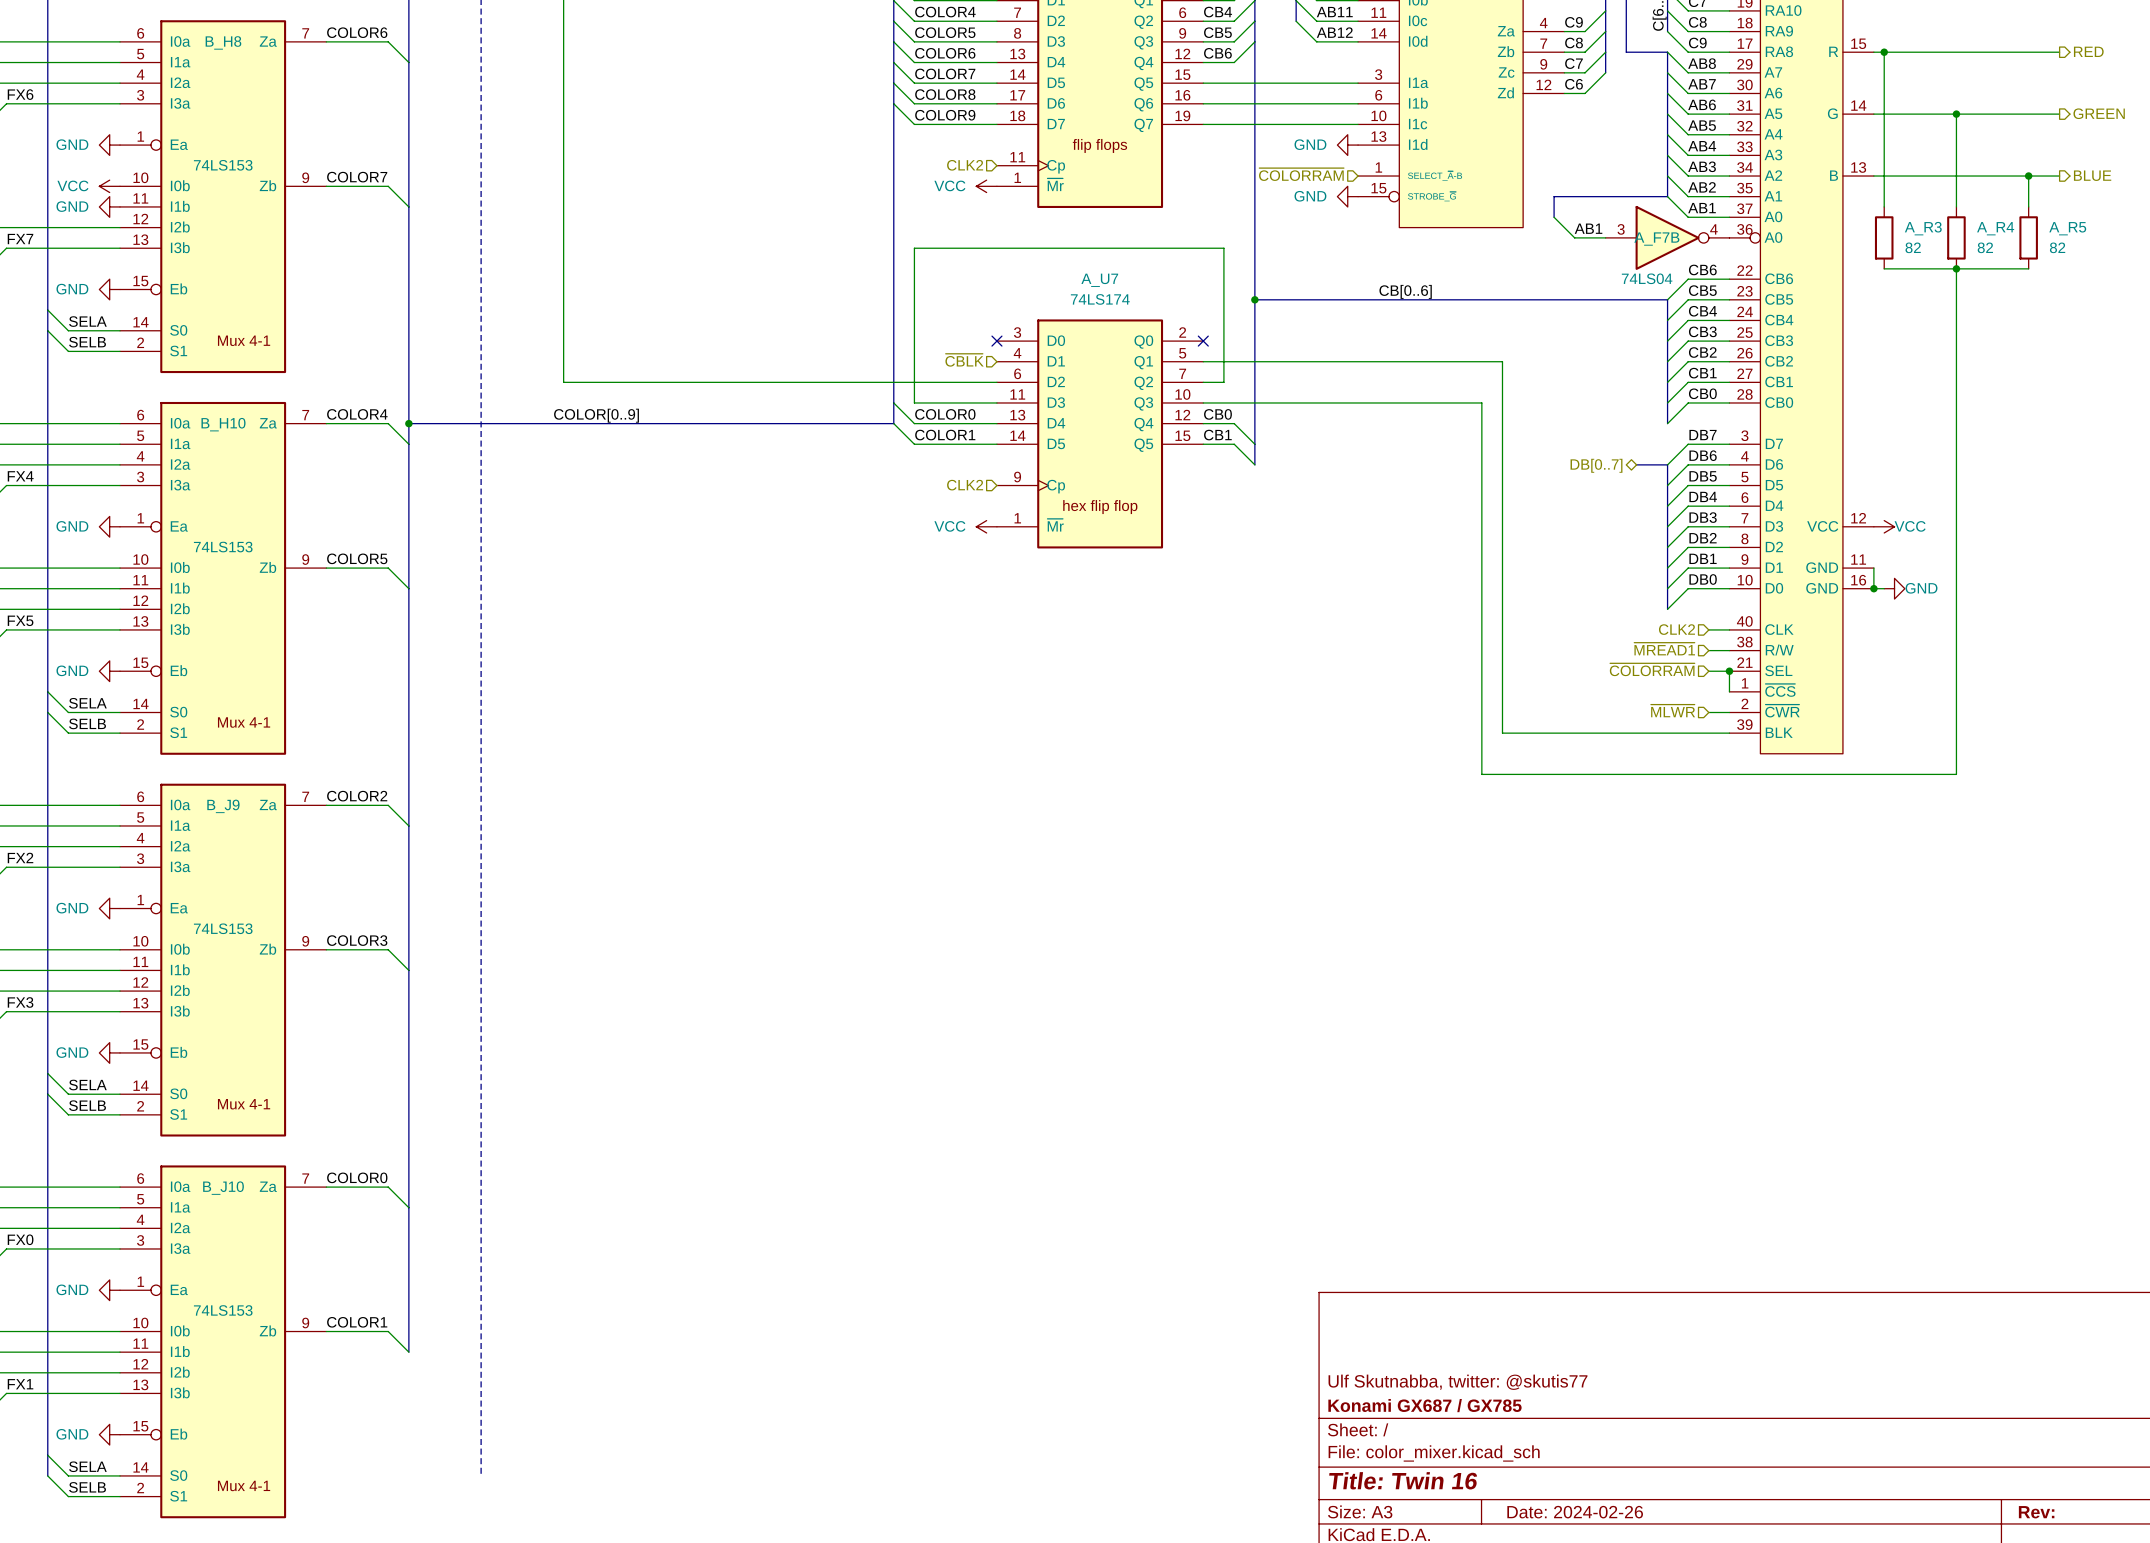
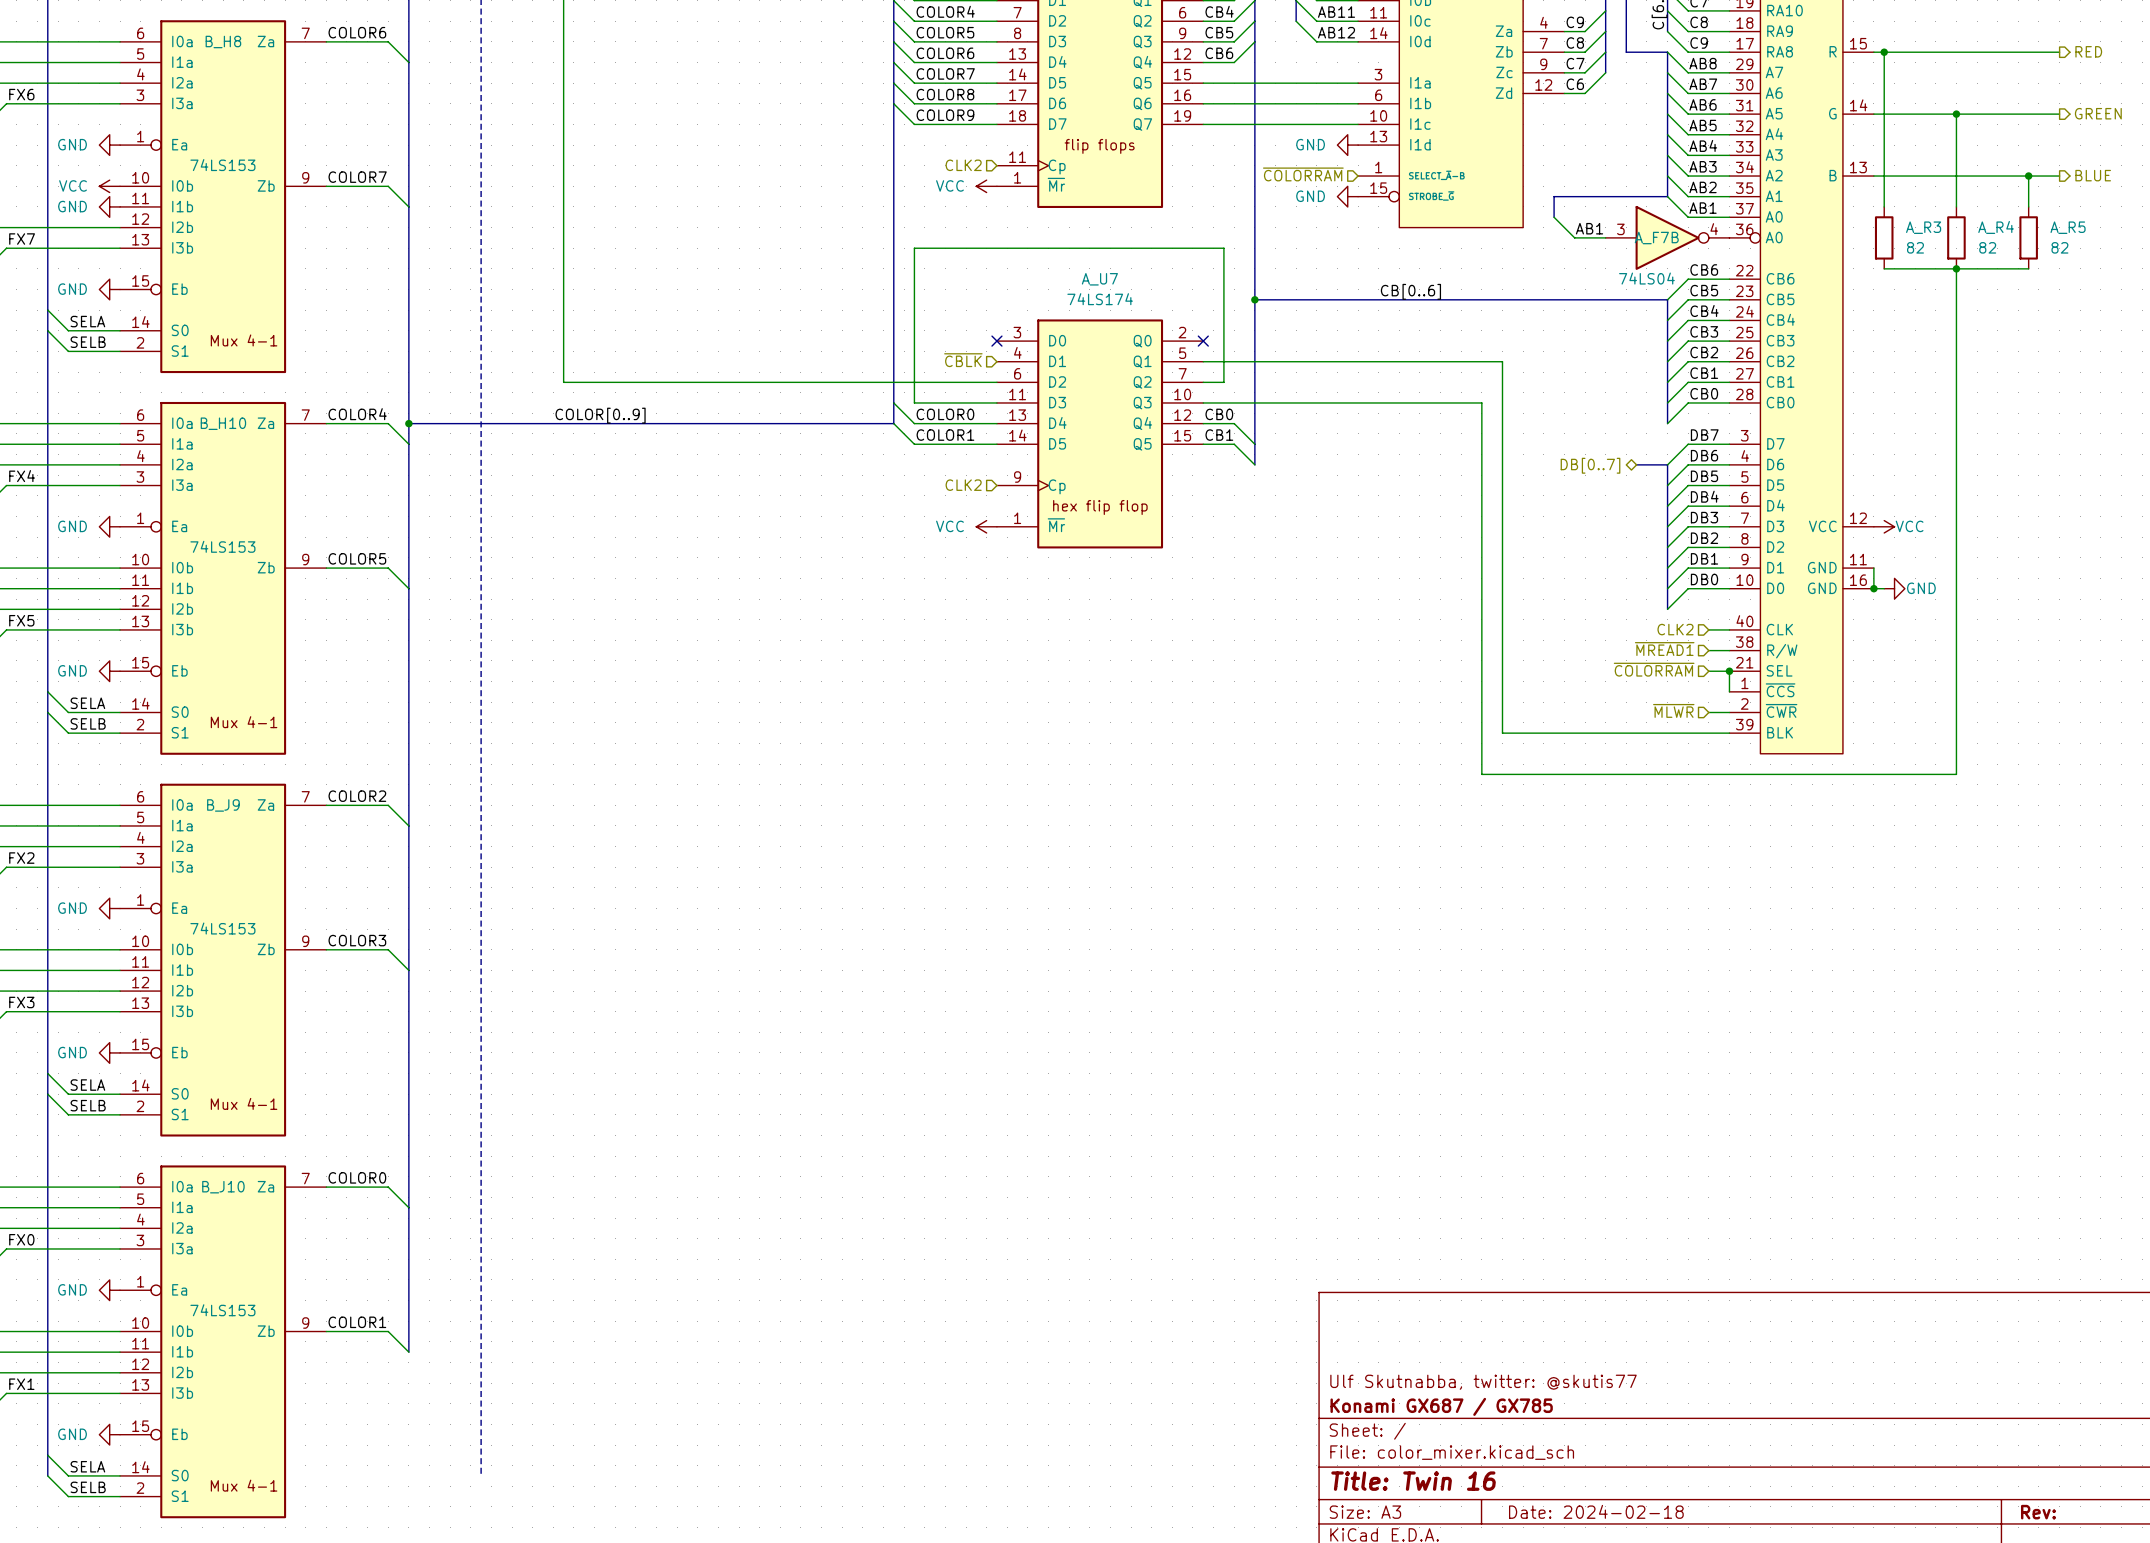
title block: Date: 2024-02-26 (1575, 1512) -> Date: 2024-02-18 (1596, 1511)

